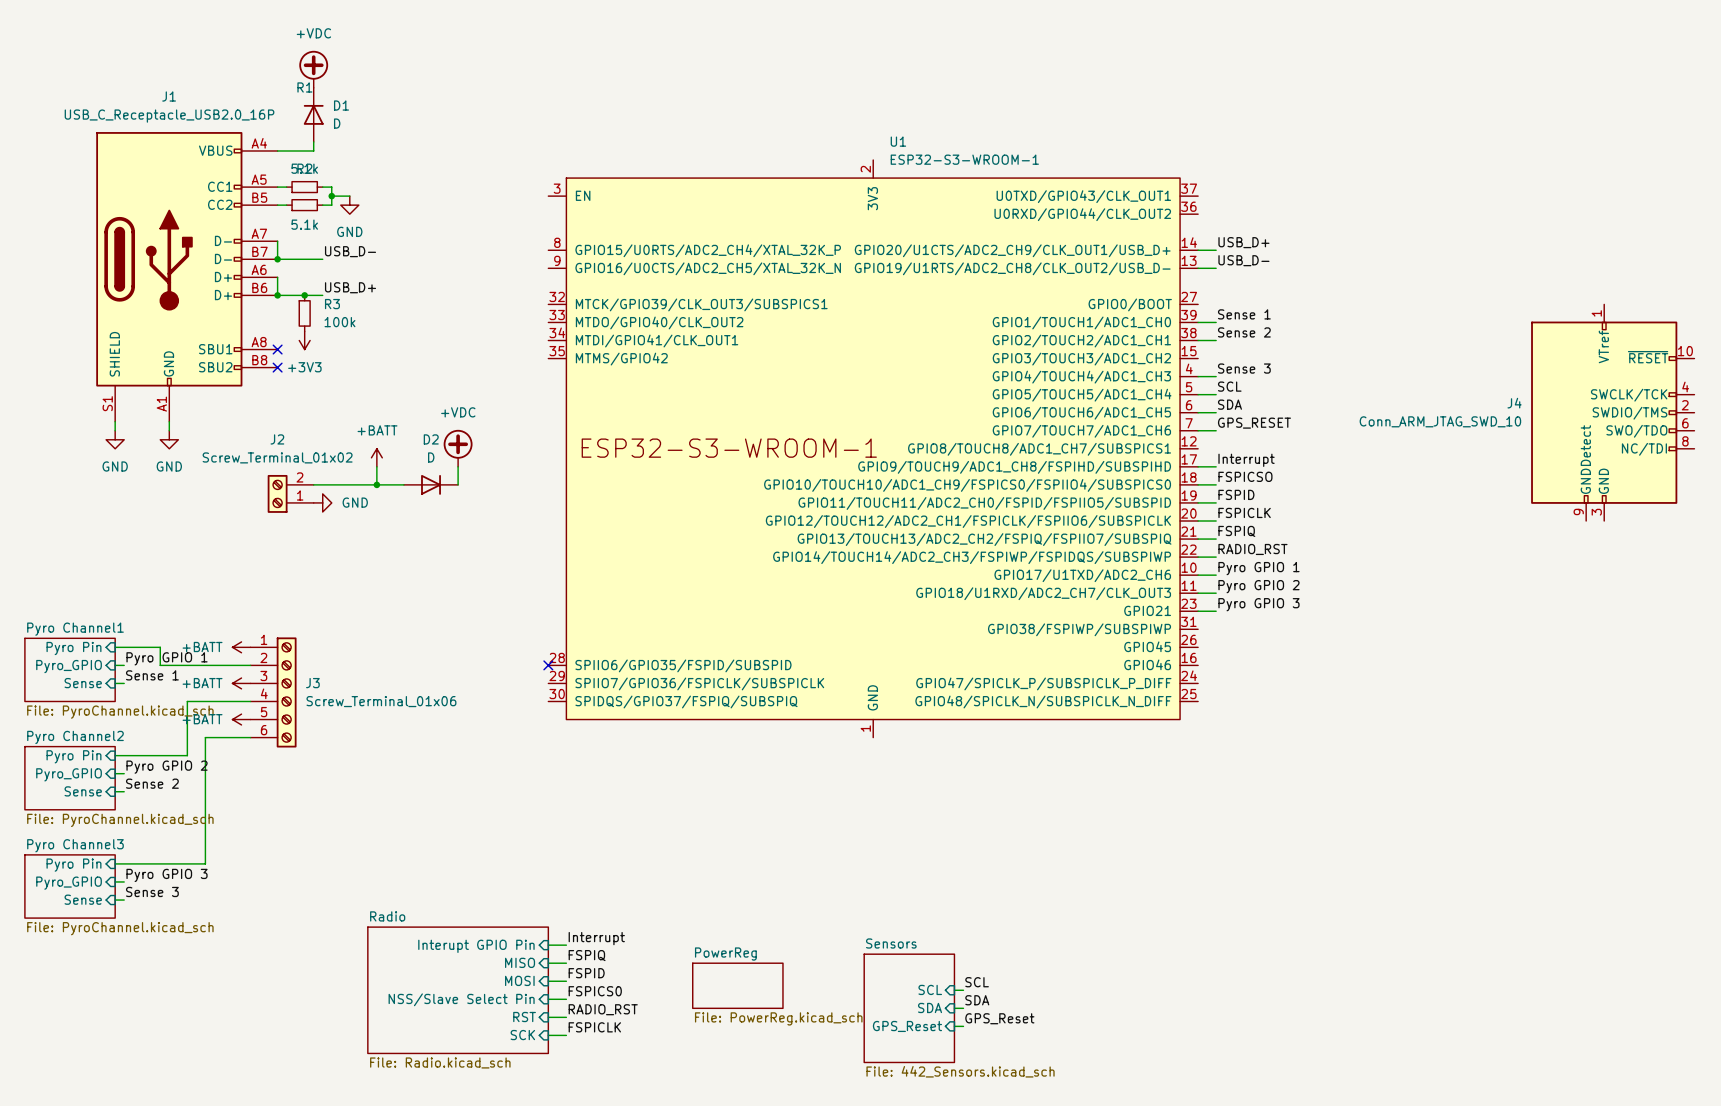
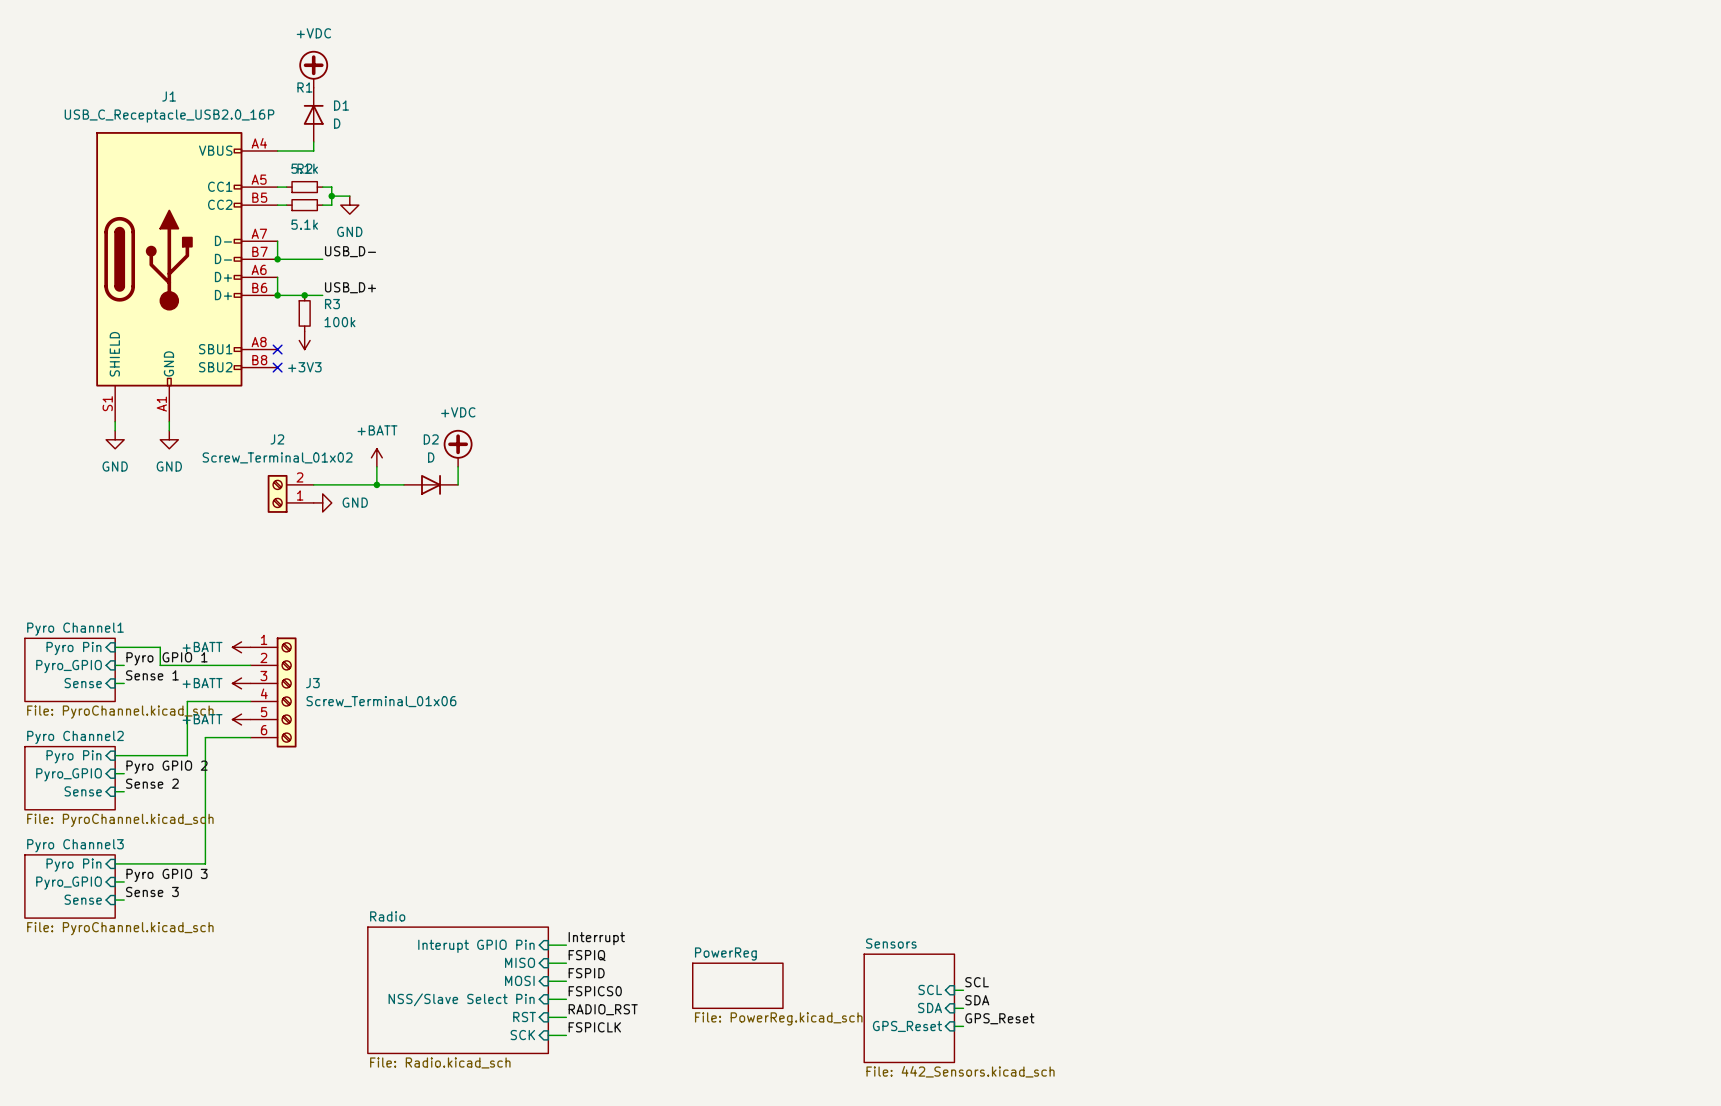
label: USB_D+ (1243, 242) -> none
wire: (1198, 250) (1216, 250) -> none
label: USB_D- (1243, 260) -> none
wire: (1198, 268) (1216, 268) -> none
label: Sense 1 (1244, 314) -> none
wire: (1198, 322) (1216, 322) -> none
label: Sense 2 (1244, 332) -> none
wire: (1198, 340) (1216, 340) -> none
label: Sense 3 (1244, 368) -> none
wire: (1198, 376) (1216, 376) -> none
label: SCL (1229, 386) -> none
wire: (1198, 394) (1216, 394) -> none
label: SDA (1229, 404) -> none
wire: (1198, 412) (1216, 412) -> none
J4: Conn_ARM_JTAG_SWD_10 (1612, 412) -> none
label: GPS_RESET (1254, 423) -> none
wire: (1198, 430) (1216, 430) -> none
U1: ESP32-S3-WROOM-1 (873, 448) -> none
label: Interrupt (1246, 460) -> none
wire: (1198, 466) (1216, 466) -> none
label: FSPICSO (1245, 476) -> none
wire: (1198, 484) (1216, 484) -> none
label: FSPID (1236, 494) -> none
wire: (1198, 502) (1216, 502) -> none
label: FSPICLK (1244, 512) -> none
wire: (1198, 521) (1216, 521) -> none
label: FSPIQ (1236, 531) -> none
wire: (1198, 539) (1216, 539) -> none
label: RADIO_RST (1252, 549) -> none
wire: (1198, 557) (1216, 557) -> none
label: Pyro GPIO 1 (1258, 568) -> none
wire: (1198, 575) (1216, 575) -> none
label: Pyro GPIO 2 (1258, 586) -> none
wire: (1198, 593) (1216, 593) -> none
label: Pyro GPIO 3 (1258, 604) -> none
wire: (1198, 611) (1216, 611) -> none
no-connect mark: (548, 665) -> none

